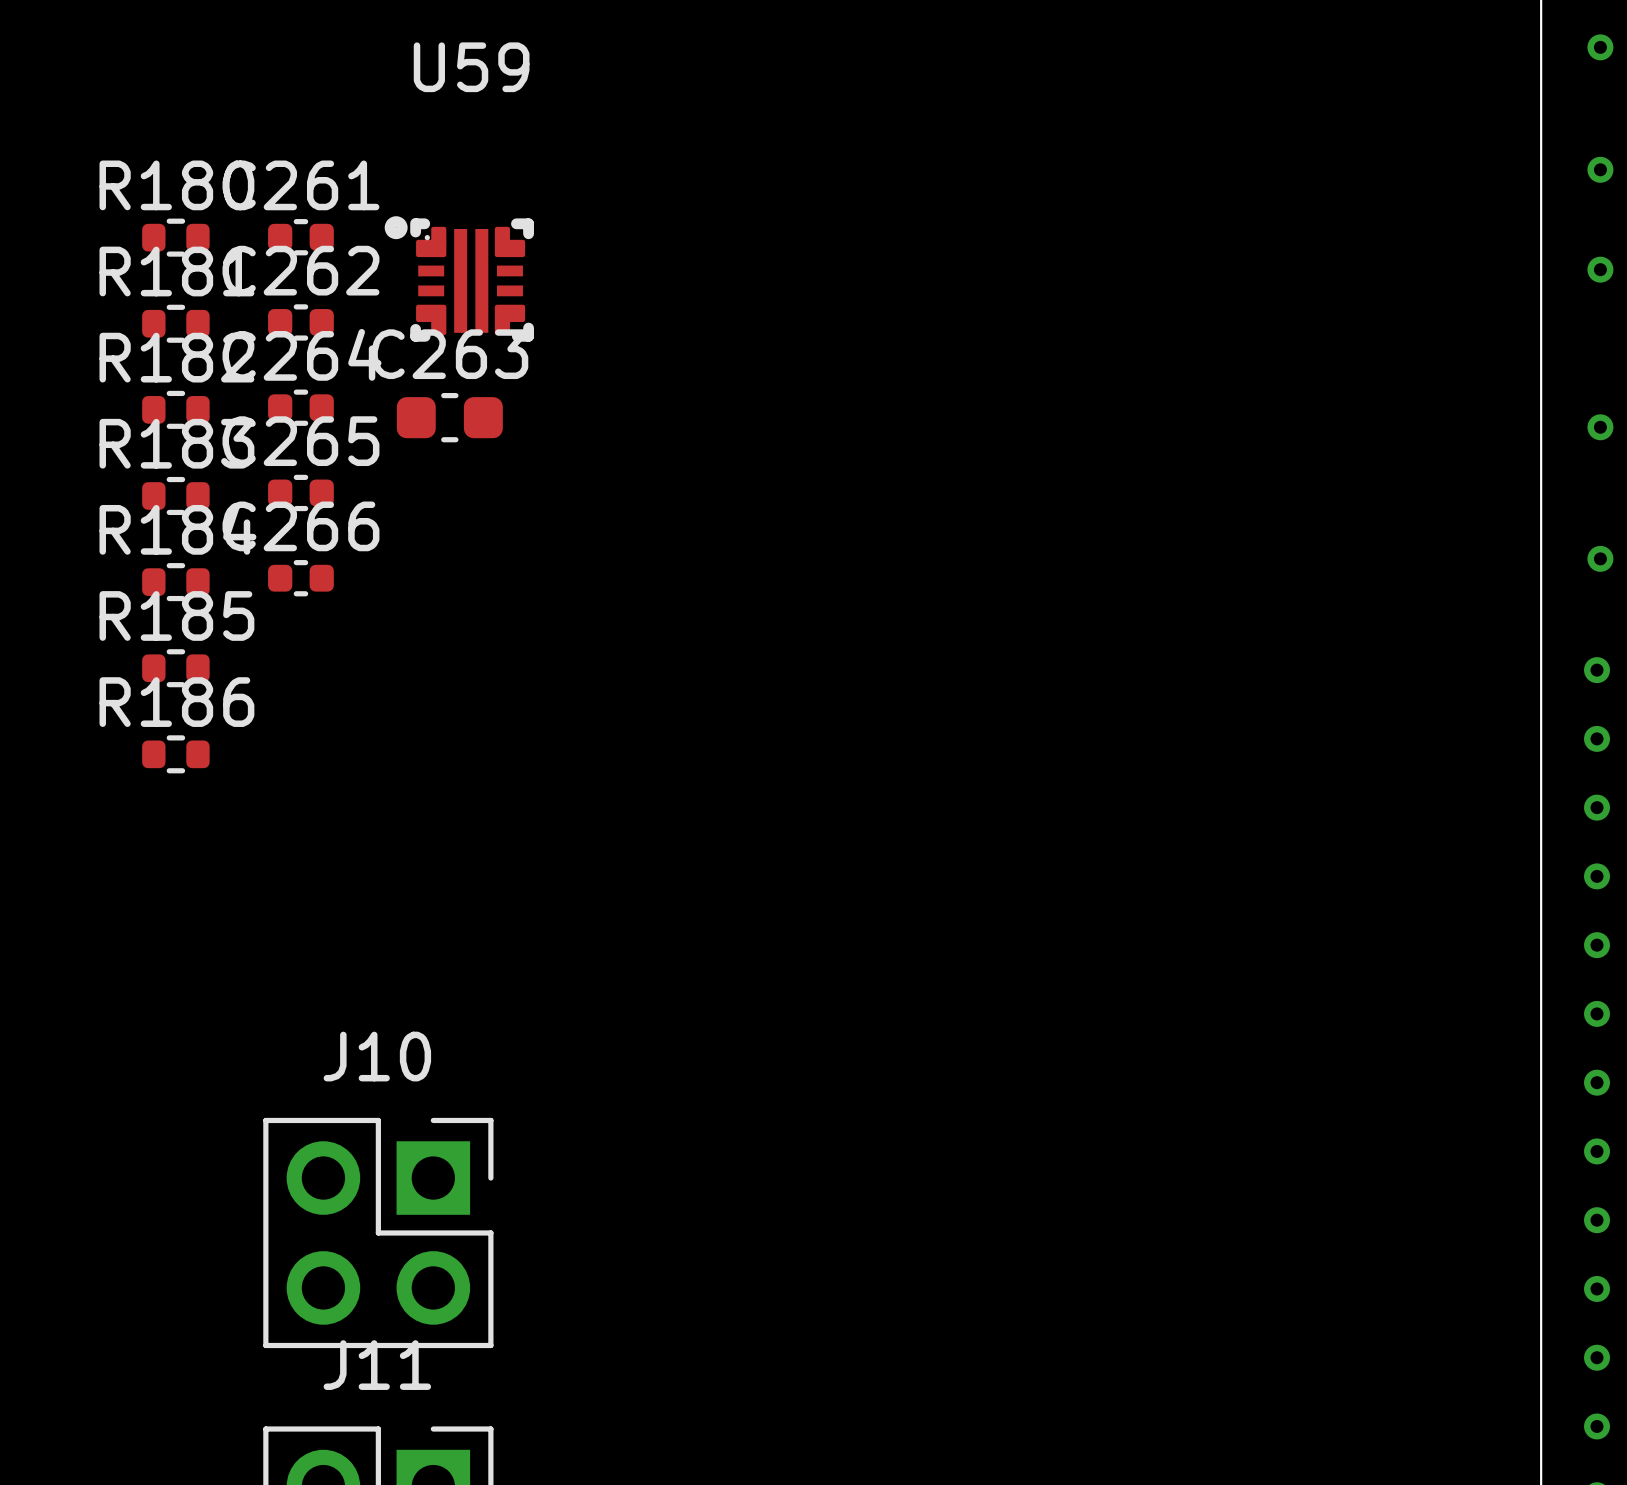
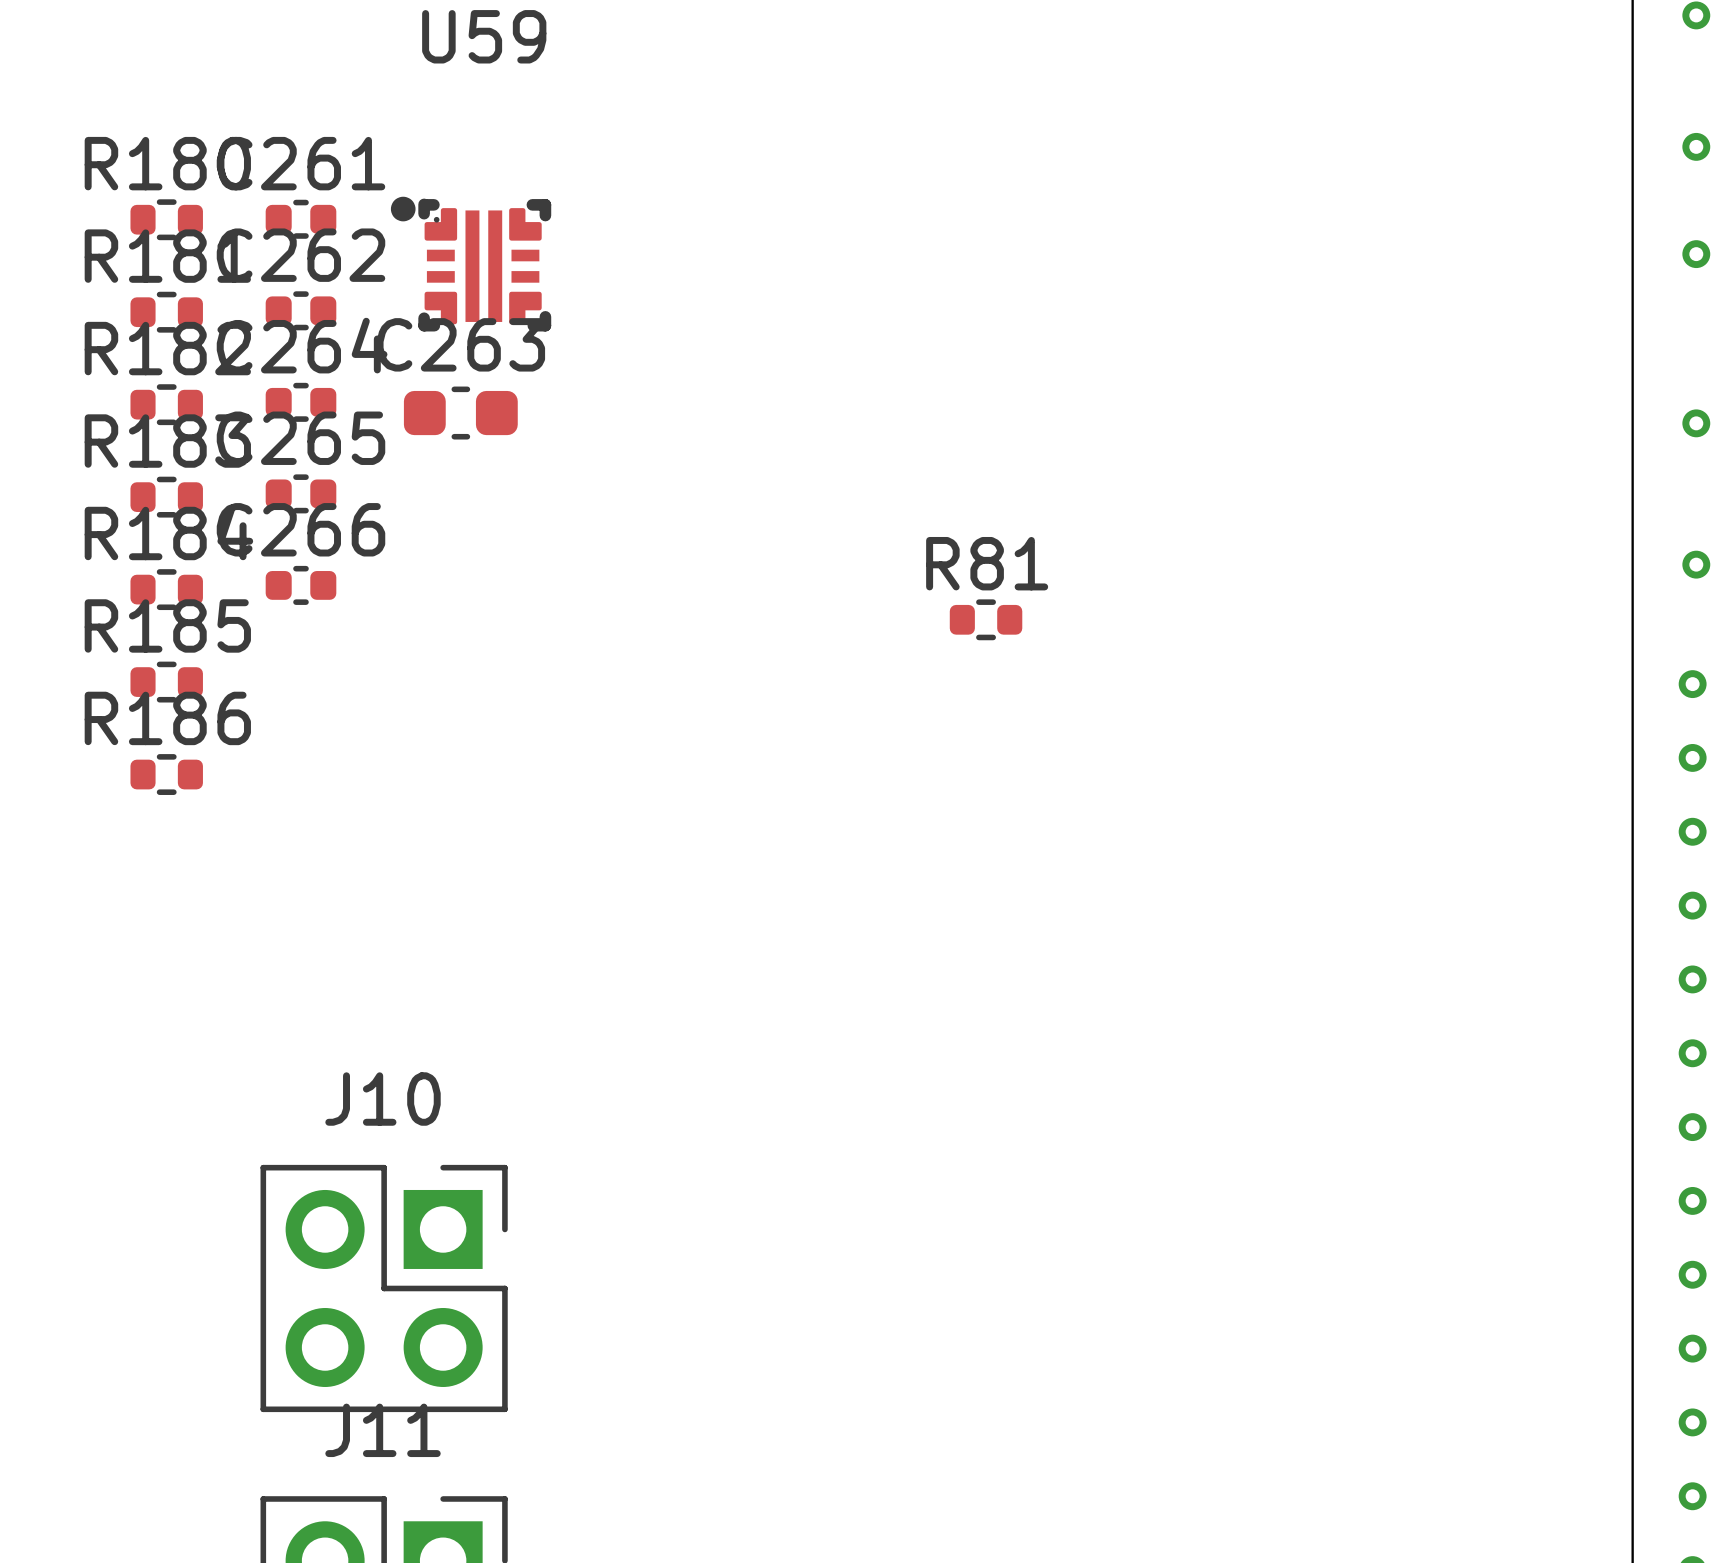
R81: none -> (986, 619)

